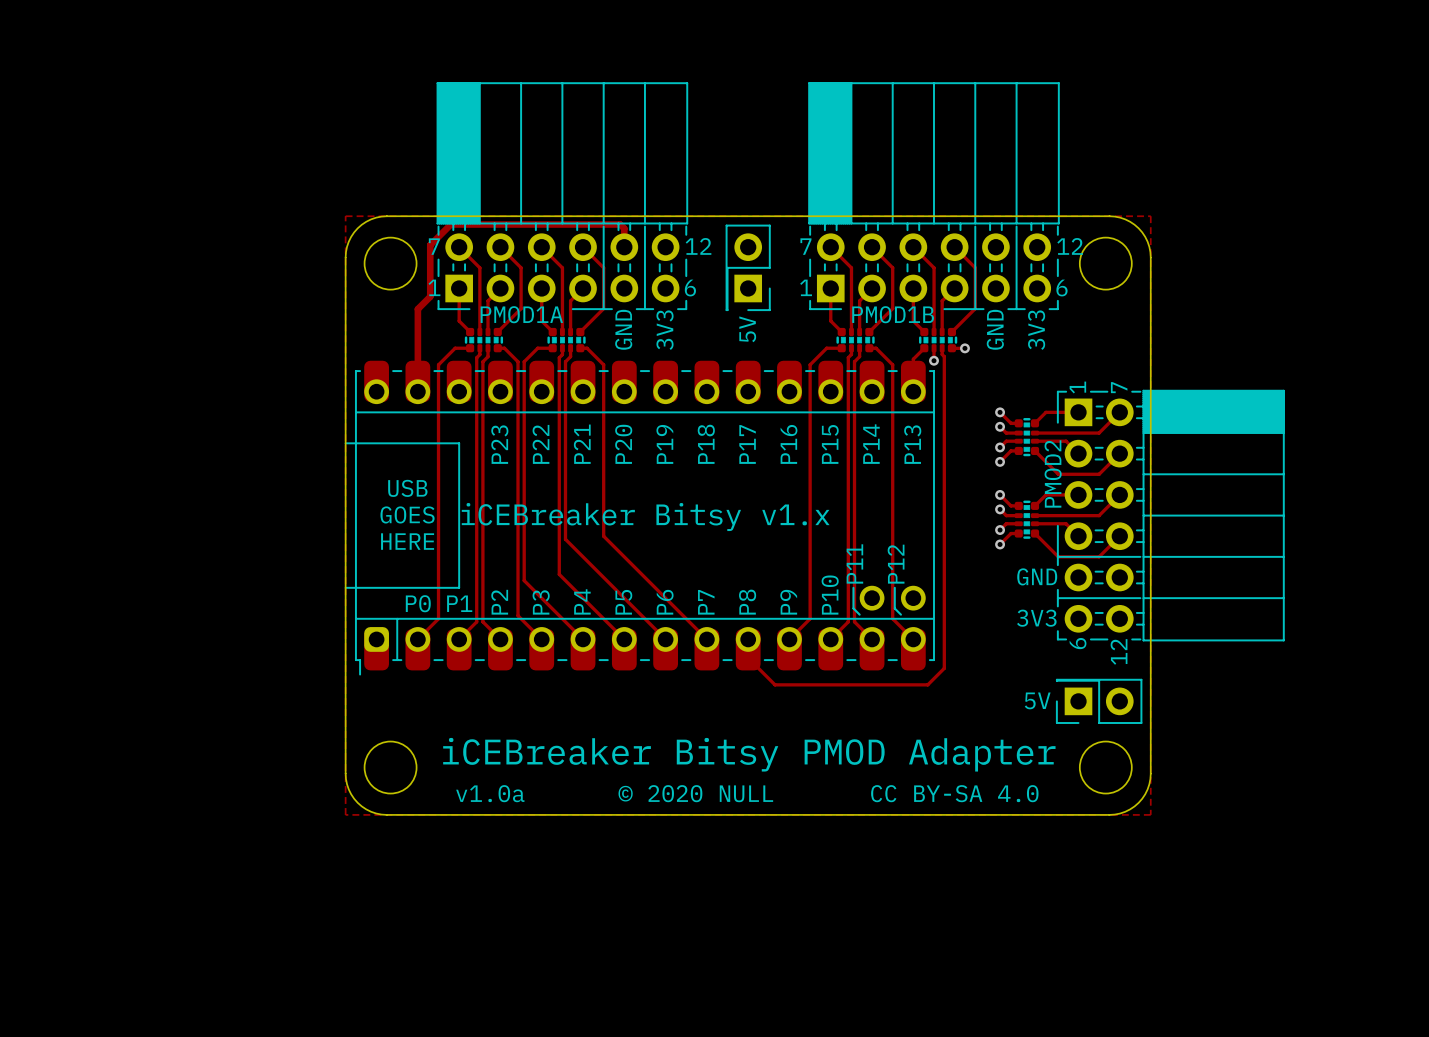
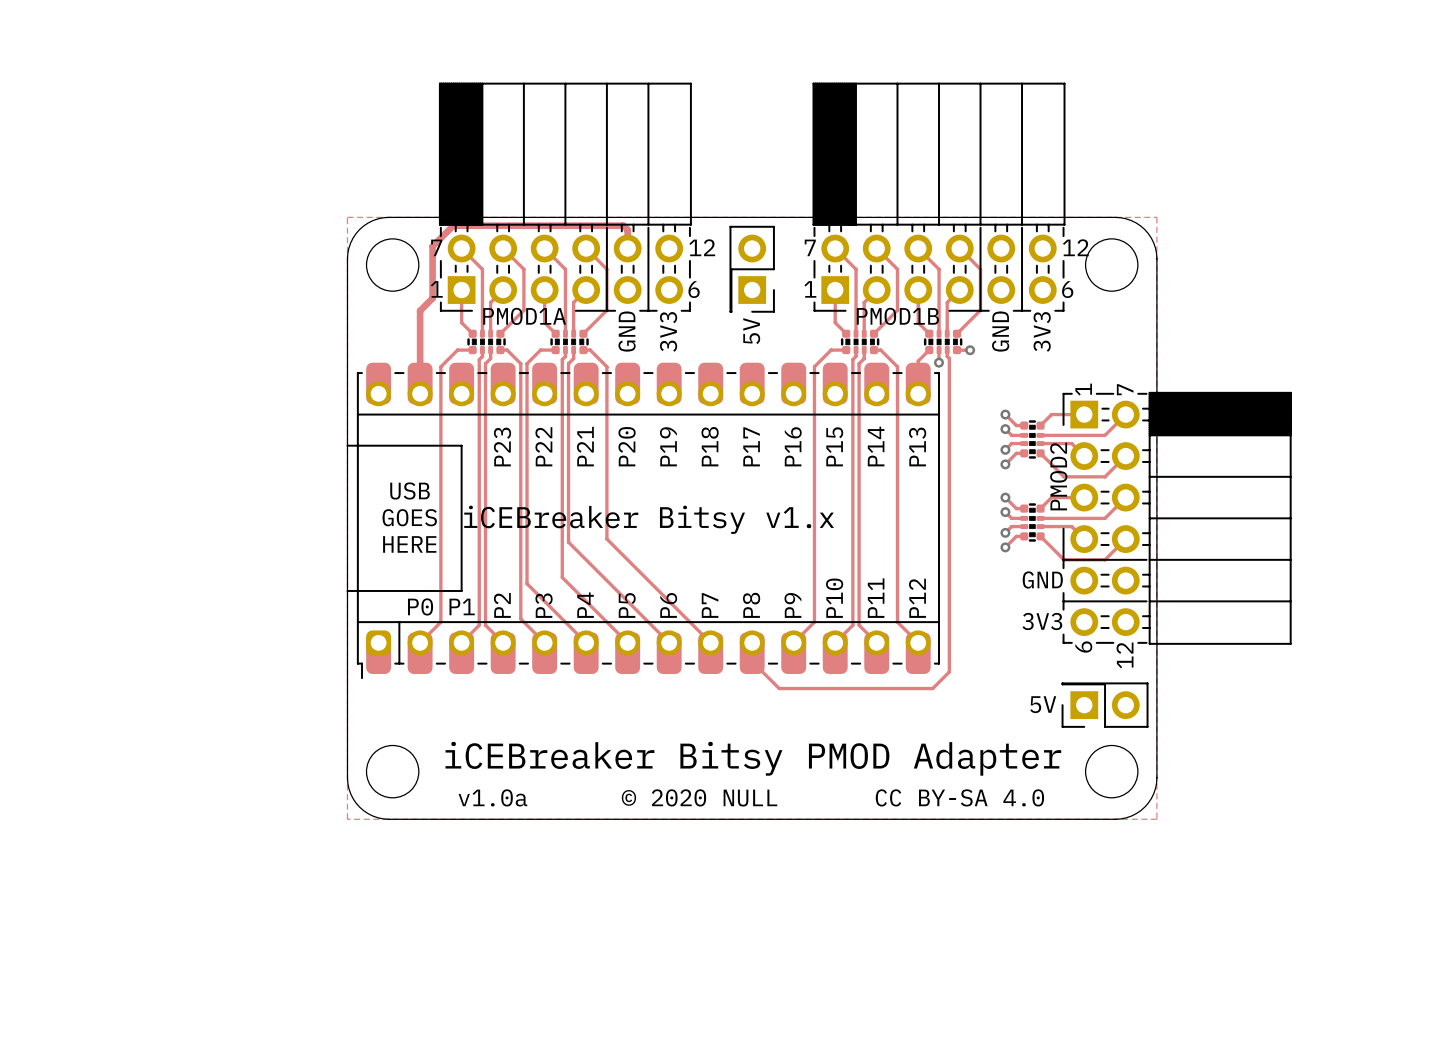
text position: P11 (854, 563) -> P11 (876, 598)
text position: P12 (896, 564) -> P12 (917, 598)
line: (853, 587) (853, 608) (859, 614) -> none
line: (894, 587) (894, 608) (900, 614) -> none
part: (872, 598) -> none
part: (913, 598) -> none

